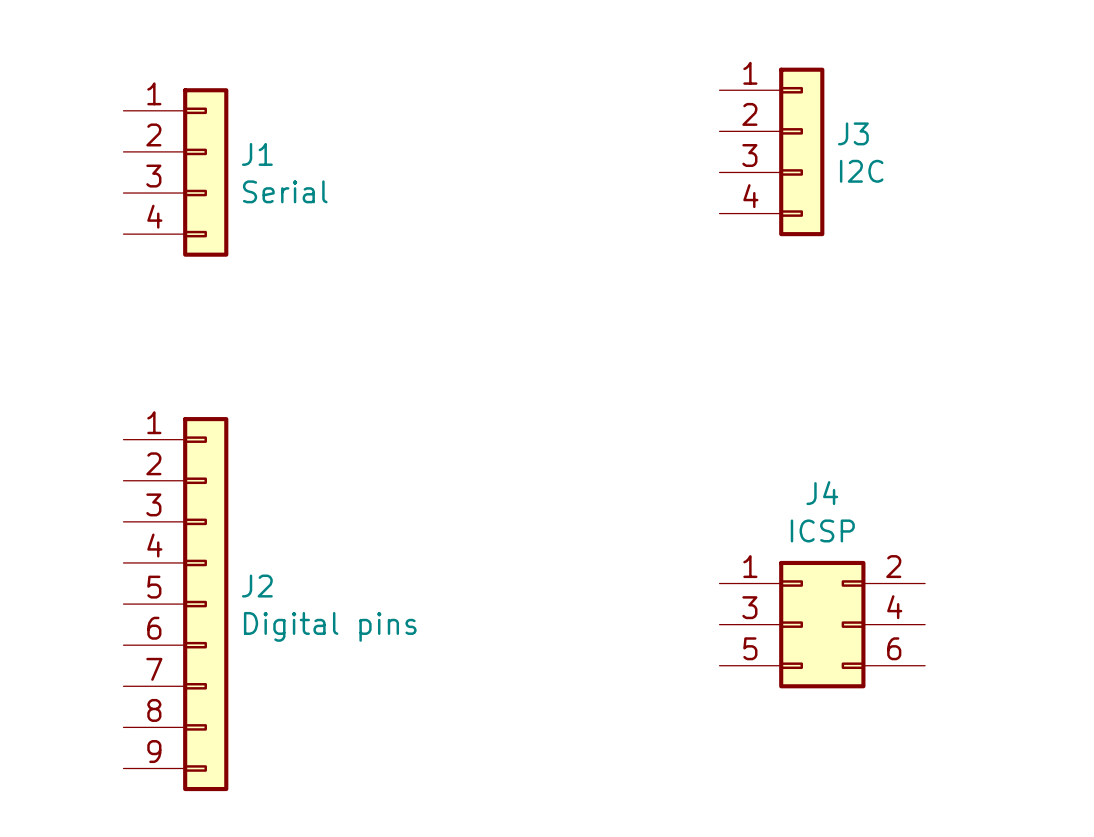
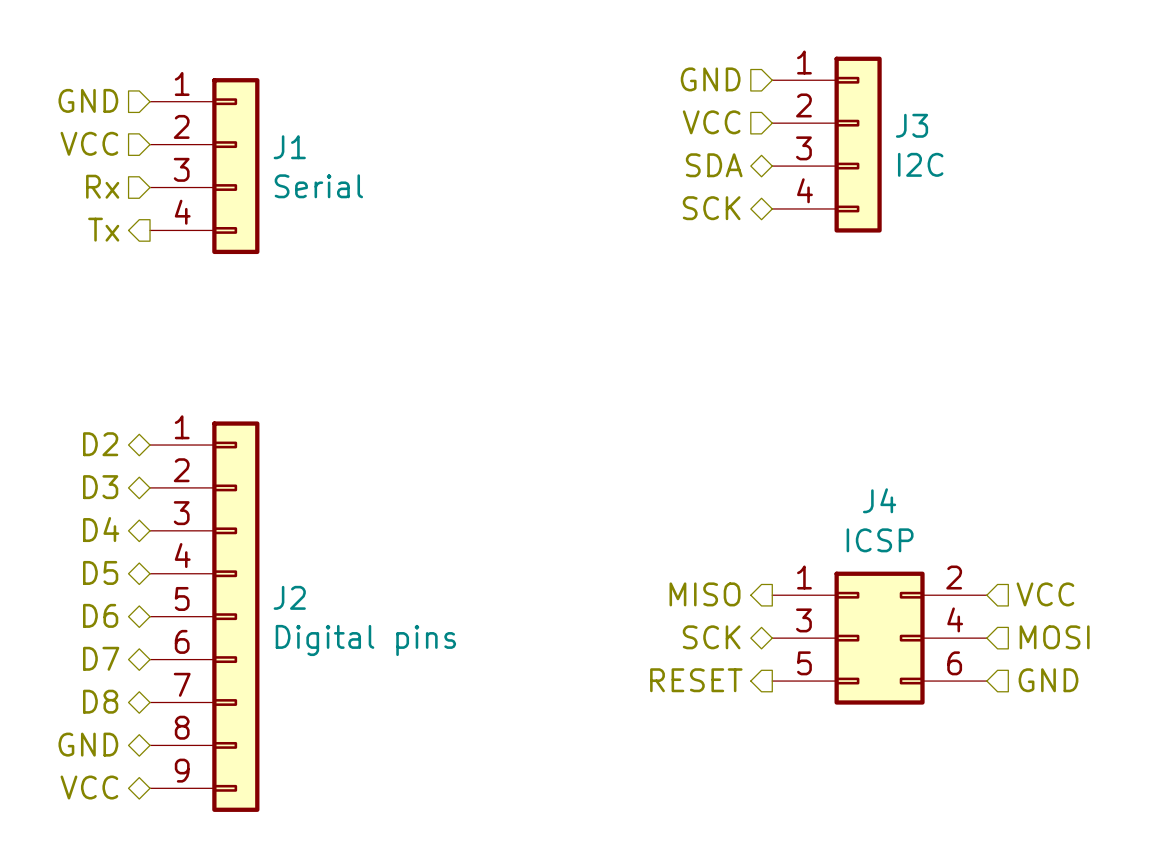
hierarchical label: none -> GND (710, 79)
hierarchical label: none -> GND (88, 100)
hierarchical label: none -> VCC (711, 122)
hierarchical label: none -> VCC (89, 143)
hierarchical label: none -> SDA (714, 165)
hierarchical label: none -> Rx (102, 186)
hierarchical label: none -> SCK (711, 208)
hierarchical label: none -> Tx (103, 229)
hierarchical label: none -> D2 (100, 444)
hierarchical label: none -> D3 (100, 487)
hierarchical label: none -> D4 (101, 529)
hierarchical label: none -> D5 (100, 572)
hierarchical label: none -> MISO (705, 594)
hierarchical label: none -> VCC (1045, 594)
hierarchical label: none -> D6 (100, 615)
hierarchical label: none -> SCK (711, 637)
hierarchical label: none -> MOSI (1054, 637)
hierarchical label: none -> D7 (101, 658)
hierarchical label: none -> RESET (696, 680)
hierarchical label: none -> GND (1048, 680)
hierarchical label: none -> D8 (100, 701)
hierarchical label: none -> GND (88, 744)
hierarchical label: none -> VCC (89, 787)

